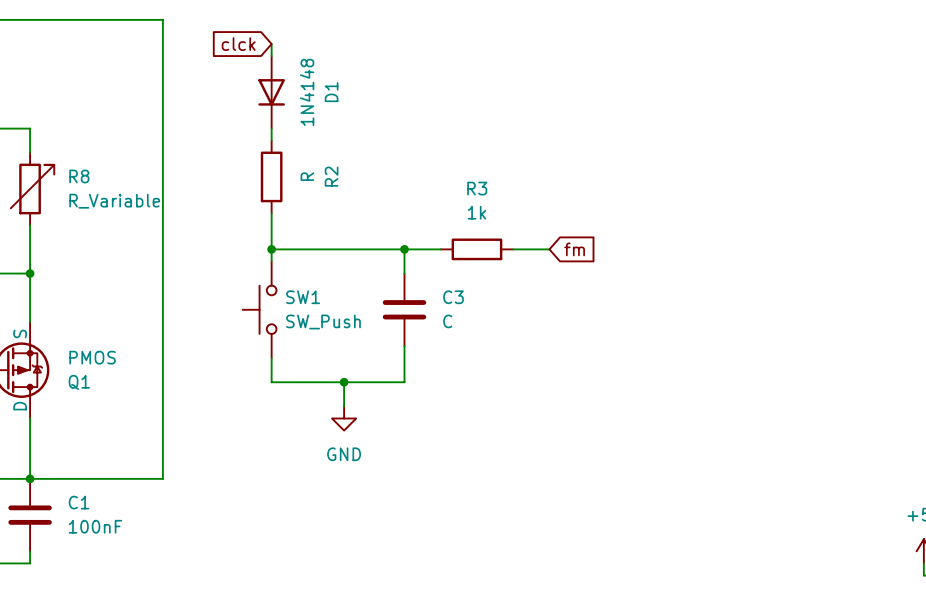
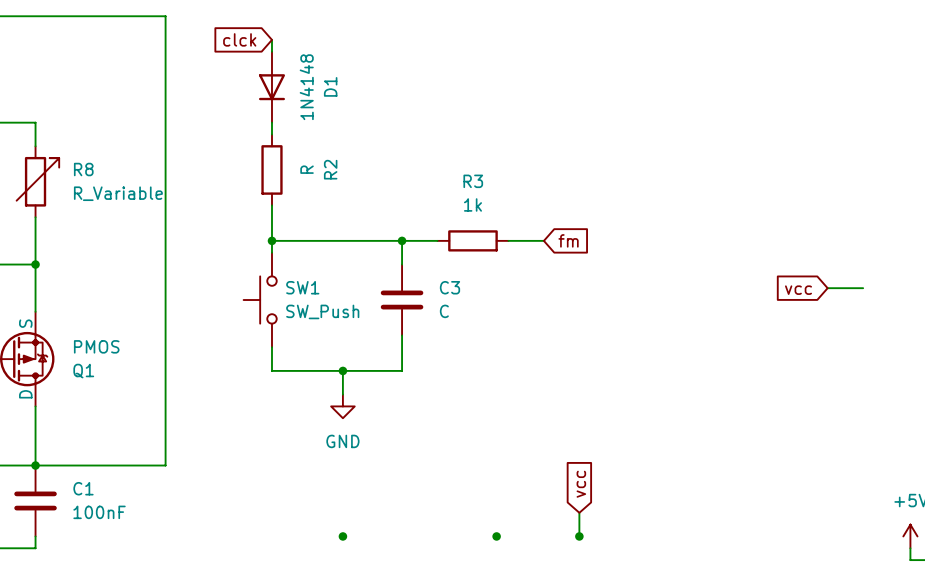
wire: none -> (827, 288) (863, 288)
global label: none -> vcc (798, 290)
global label: none -> vcc (581, 484)
wire: none -> (579, 512) (579, 536)
junction: none -> (342, 536)
junction: none -> (496, 536)
junction: none -> (579, 536)

